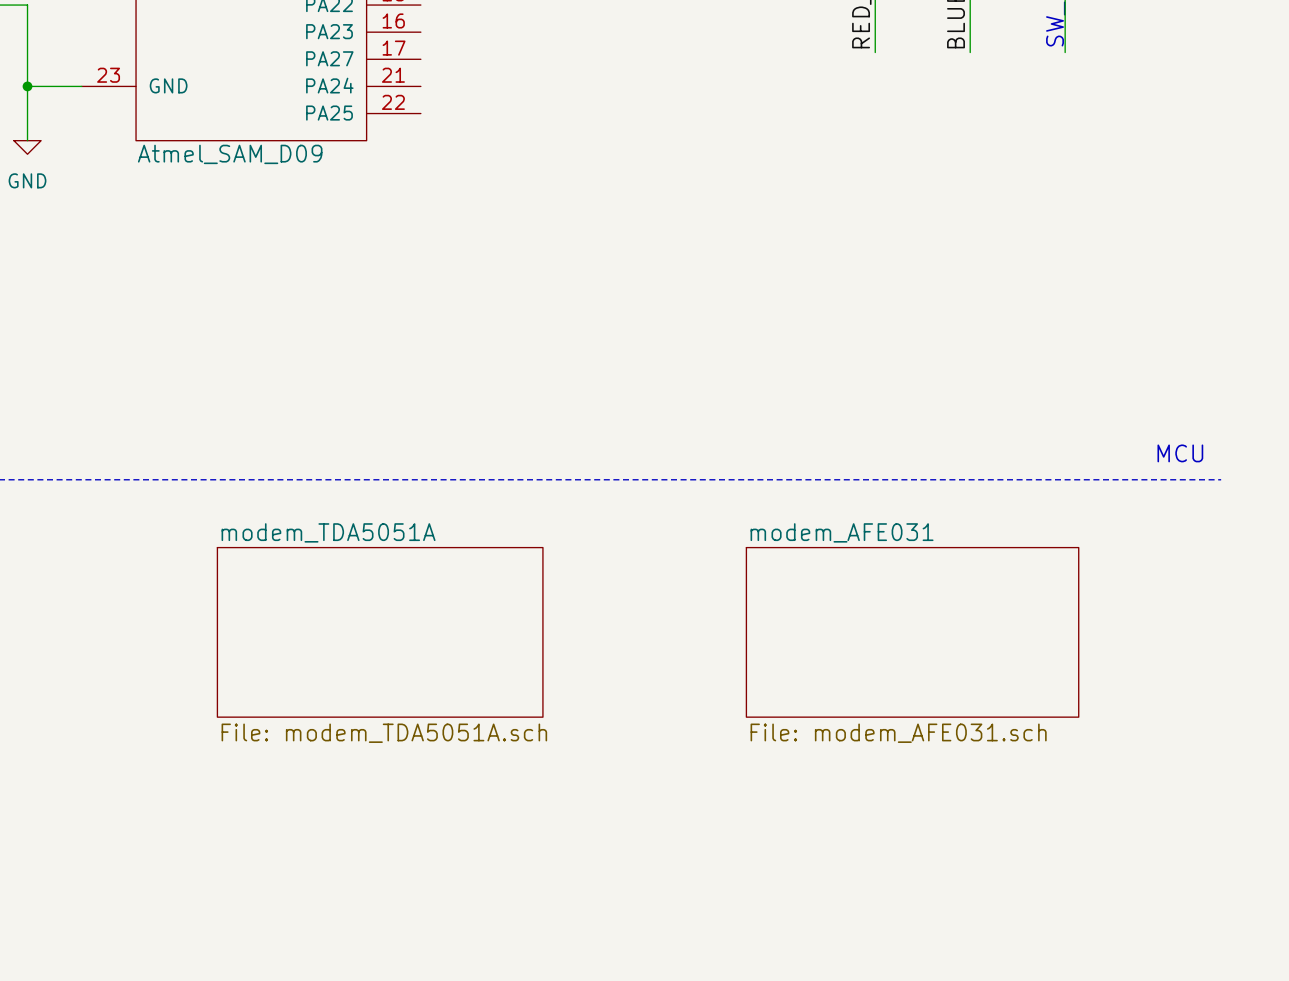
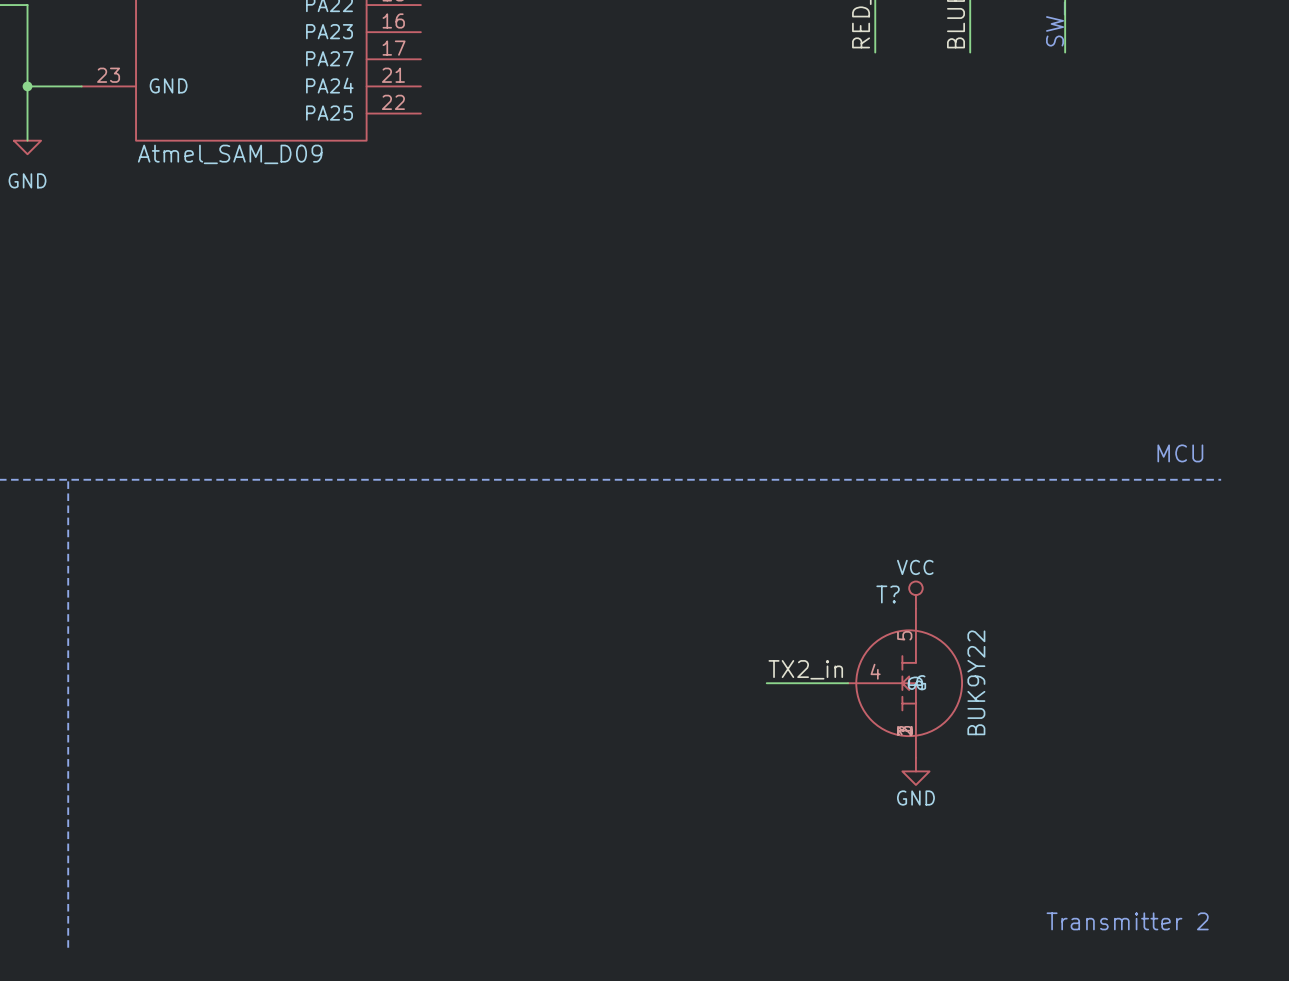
line: none -> (68, 479) (68, 947)
power symbol: none -> VCC (915, 595)
sheet modem_TDA5051A: File: modem_TDA5051A.sch (380, 632) -> none
sheet modem_AFE031: File: modem_AFE031.sch (912, 632) -> none
label: none -> TX2_in (805, 669)
wire: none -> (766, 683) (848, 683)
T?: none -> BUK9Y22 (905, 683)
power symbol: none -> GND (915, 771)
text: none -> Transmitter 2 (1127, 921)

